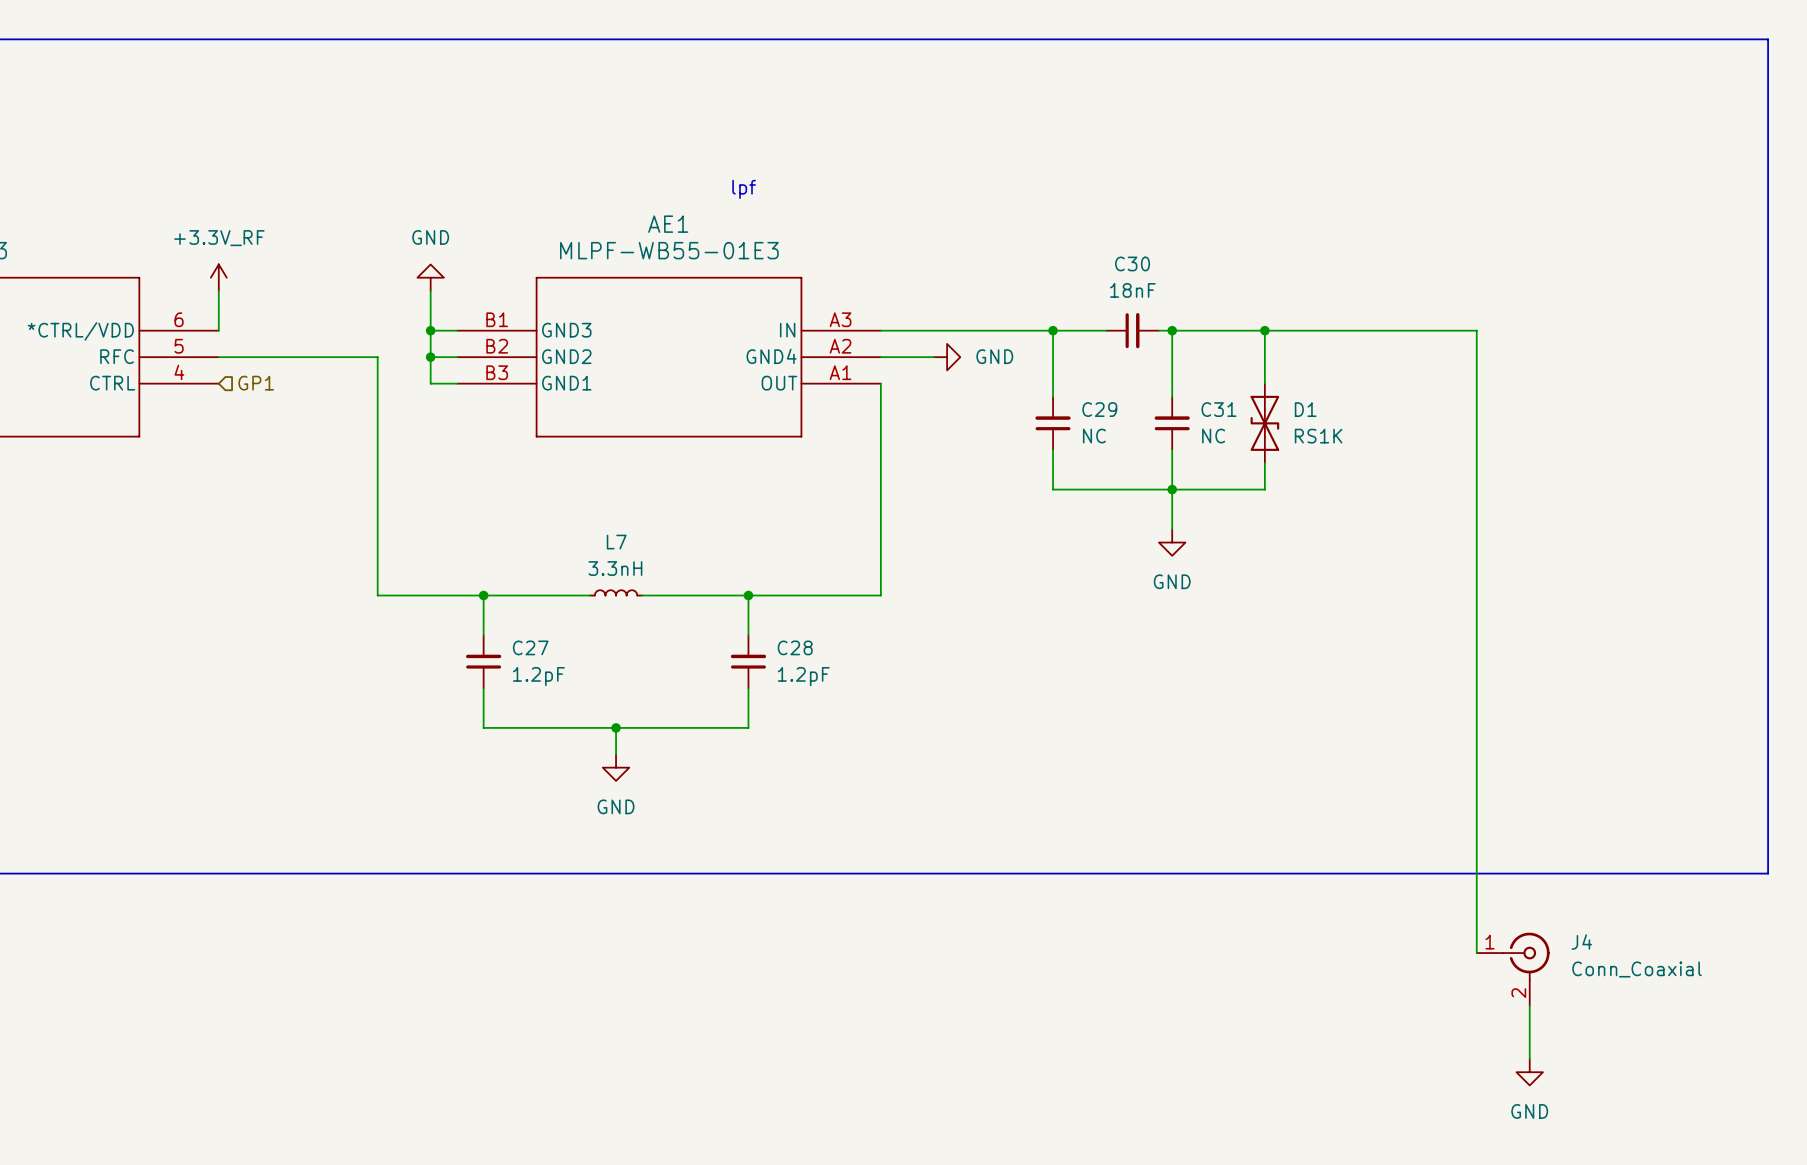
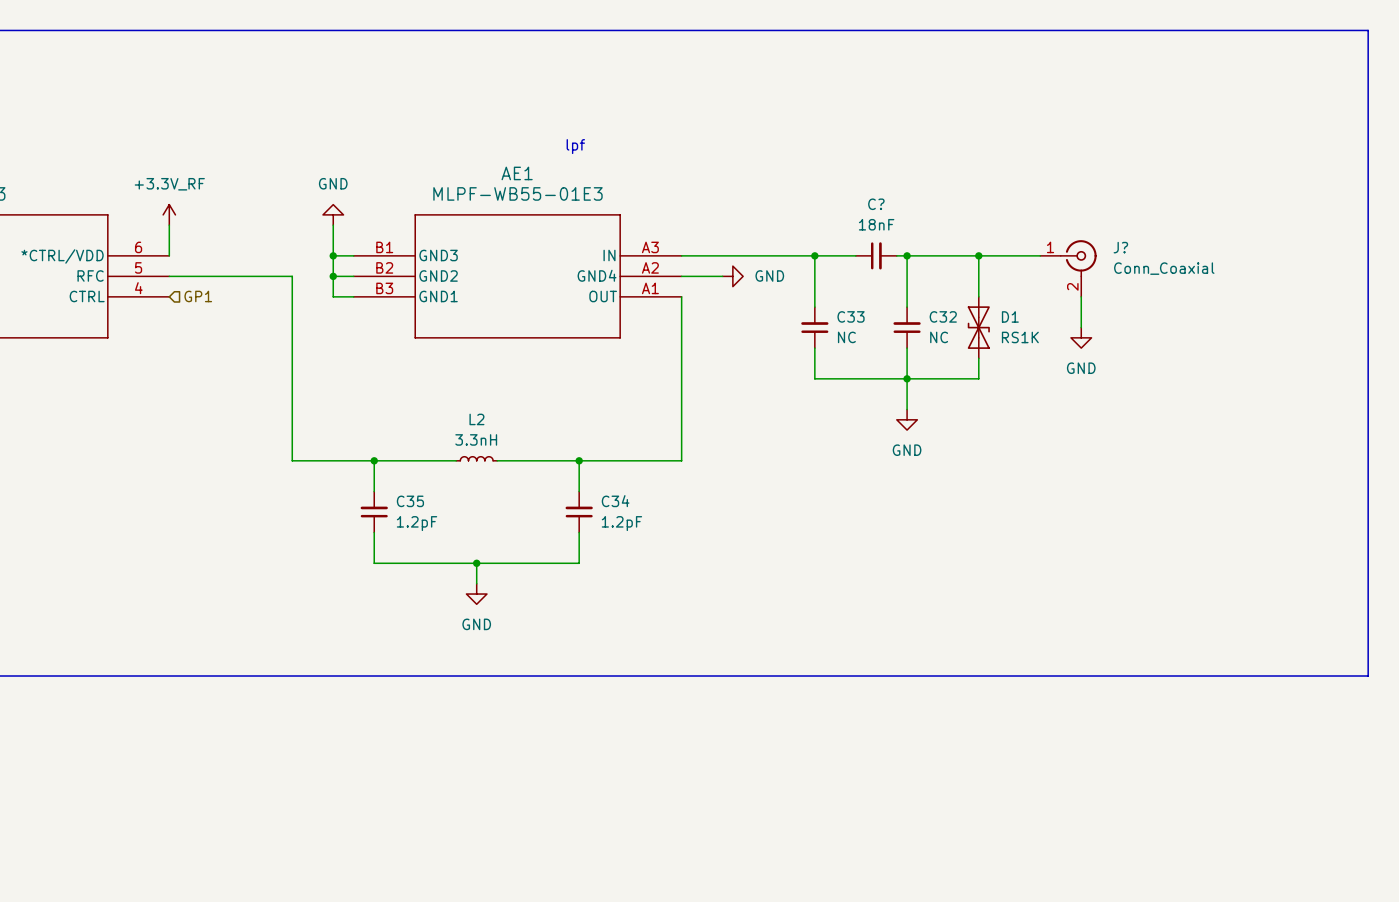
C30 name: C30 (1132, 263) -> C? (876, 204)
wire: (1344, 330) (1476, 330) (1476, 953) -> none
J?: none -> Conn_Coaxial (1068, 268)
wire: none -> (1081, 296) (1081, 327)
C29 name: C29 (1099, 409) -> C33 (851, 316)
C31 name: C31 (1218, 409) -> C32 (943, 316)
power symbol: none -> GND (1081, 337)
L7 name: L7 (616, 542) -> L2 (476, 419)
C27 name: C27 (530, 647) -> C35 (410, 501)
C28 name: C28 (795, 647) -> C34 (615, 501)
J4: Conn_Coaxial (1513, 969) -> none
wire: (1529, 1006) (1529, 1058) -> none
power symbol: GND (1529, 1072) -> none

